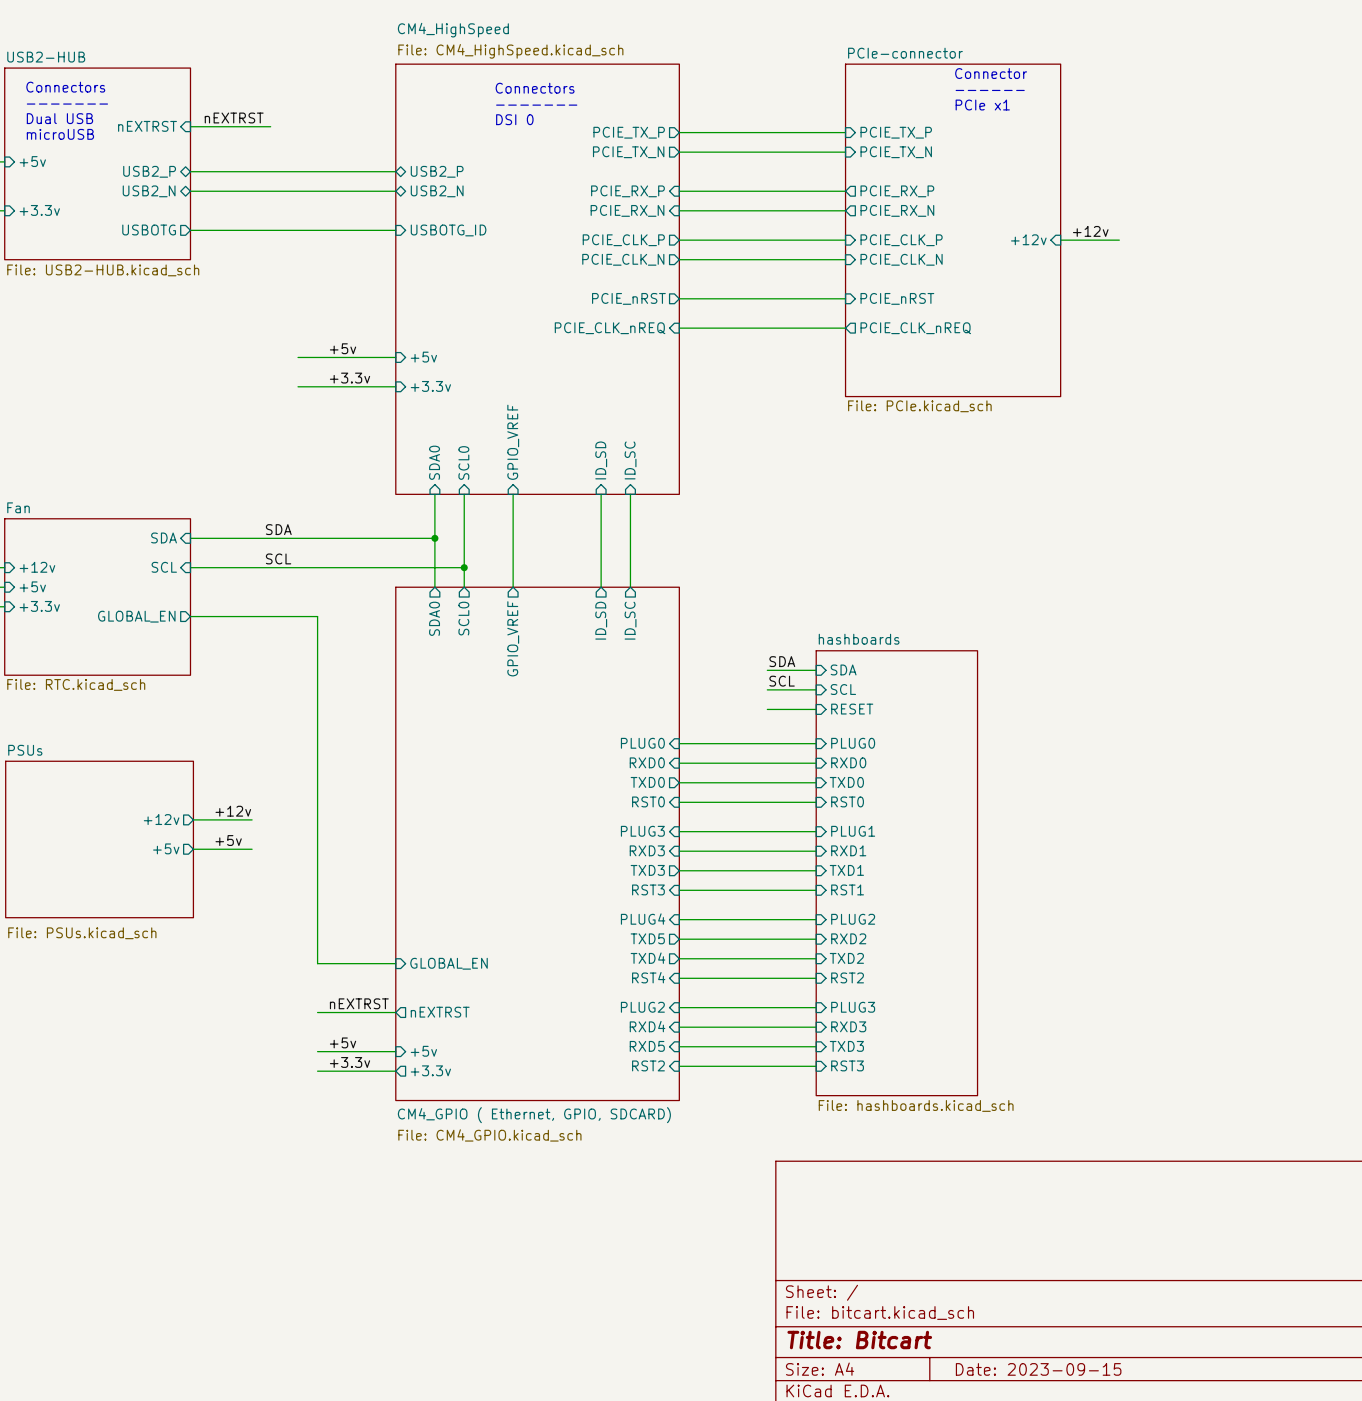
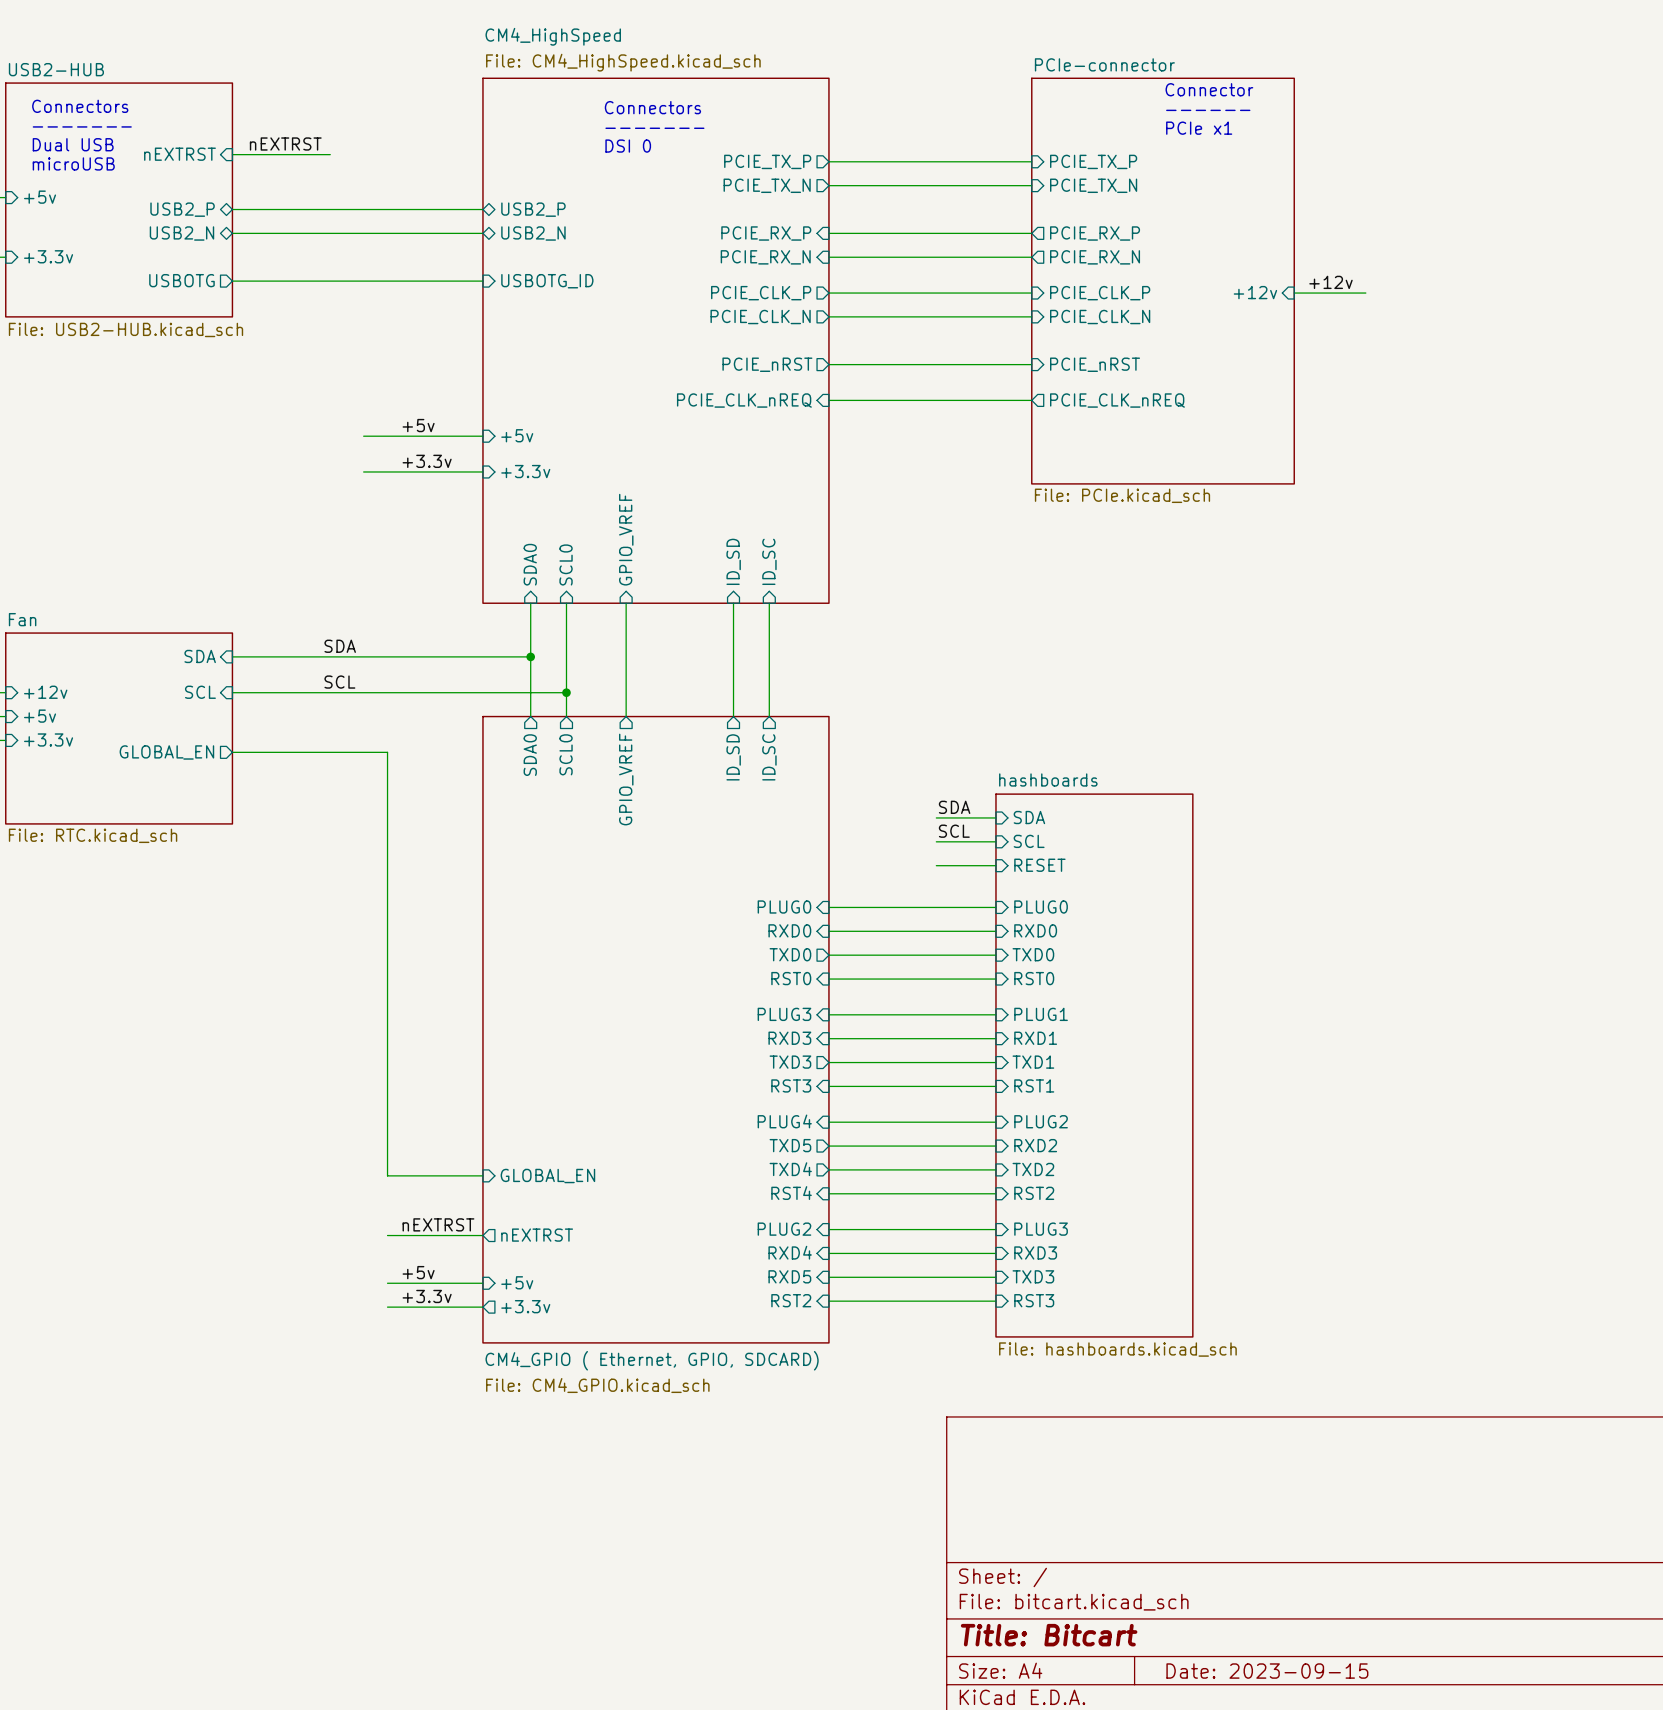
label: +12v (233, 811) -> none
sheet pin: +12v (161, 819) -> none
wire: (193, 819) (252, 819) -> none
sheet PSUs: File: PSUs.kicad_sch (99, 839) -> none
label: +5v (228, 840) -> none
sheet pin: +5v (166, 848) -> none
wire: (193, 849) (252, 849) -> none

